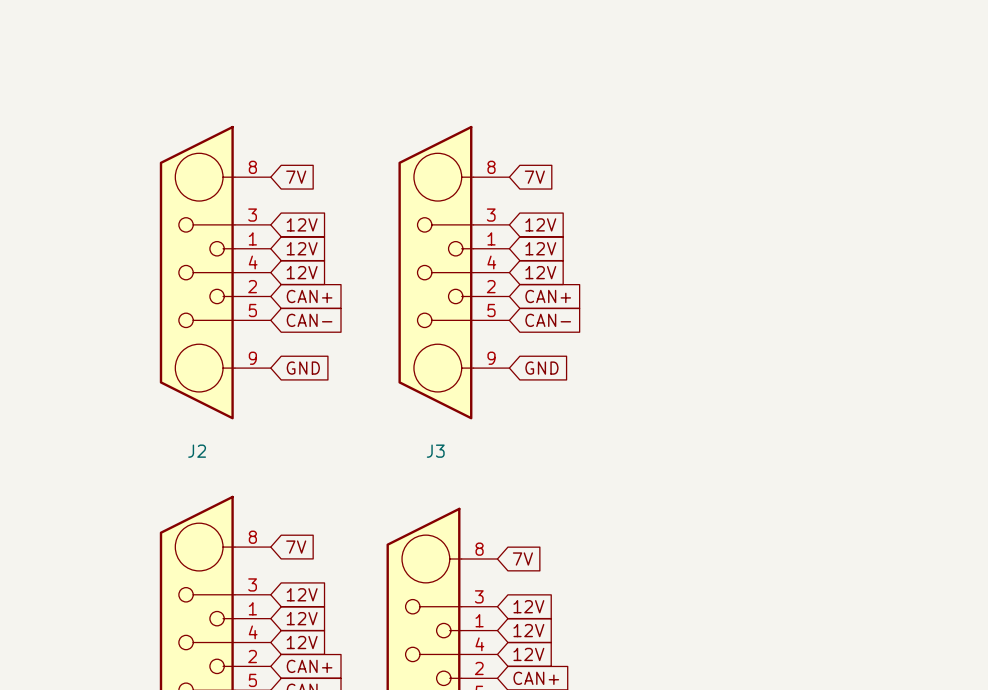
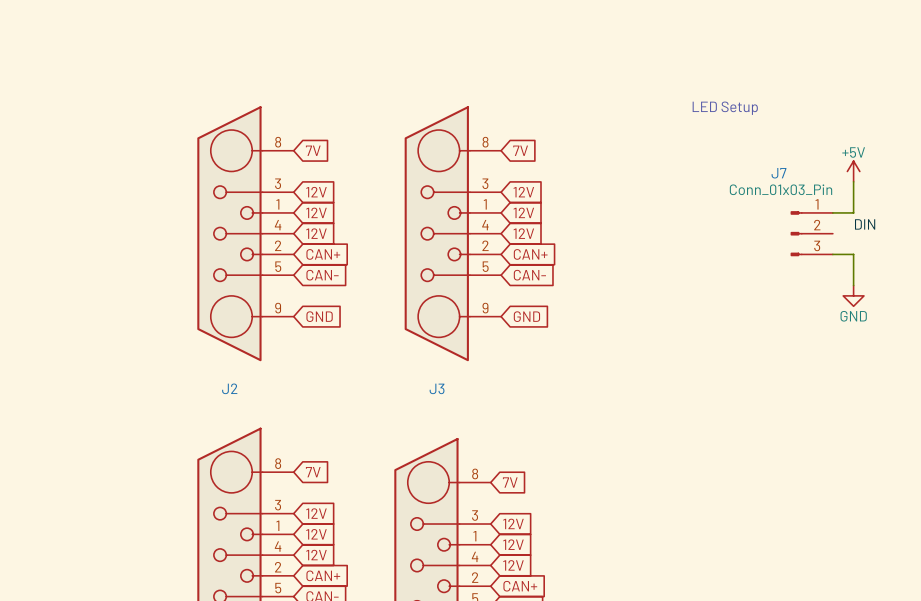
text: none -> LED Setup (725, 108)
power symbol: none -> +5V (853, 171)
wire: none -> (853, 181) (853, 212) (832, 212)
label: none -> DIN (865, 224)
J7: none -> Conn_01x03_Pin (811, 233)
wire: none -> (832, 254) (853, 254) (853, 285)
power symbol: none -> GND (853, 295)

